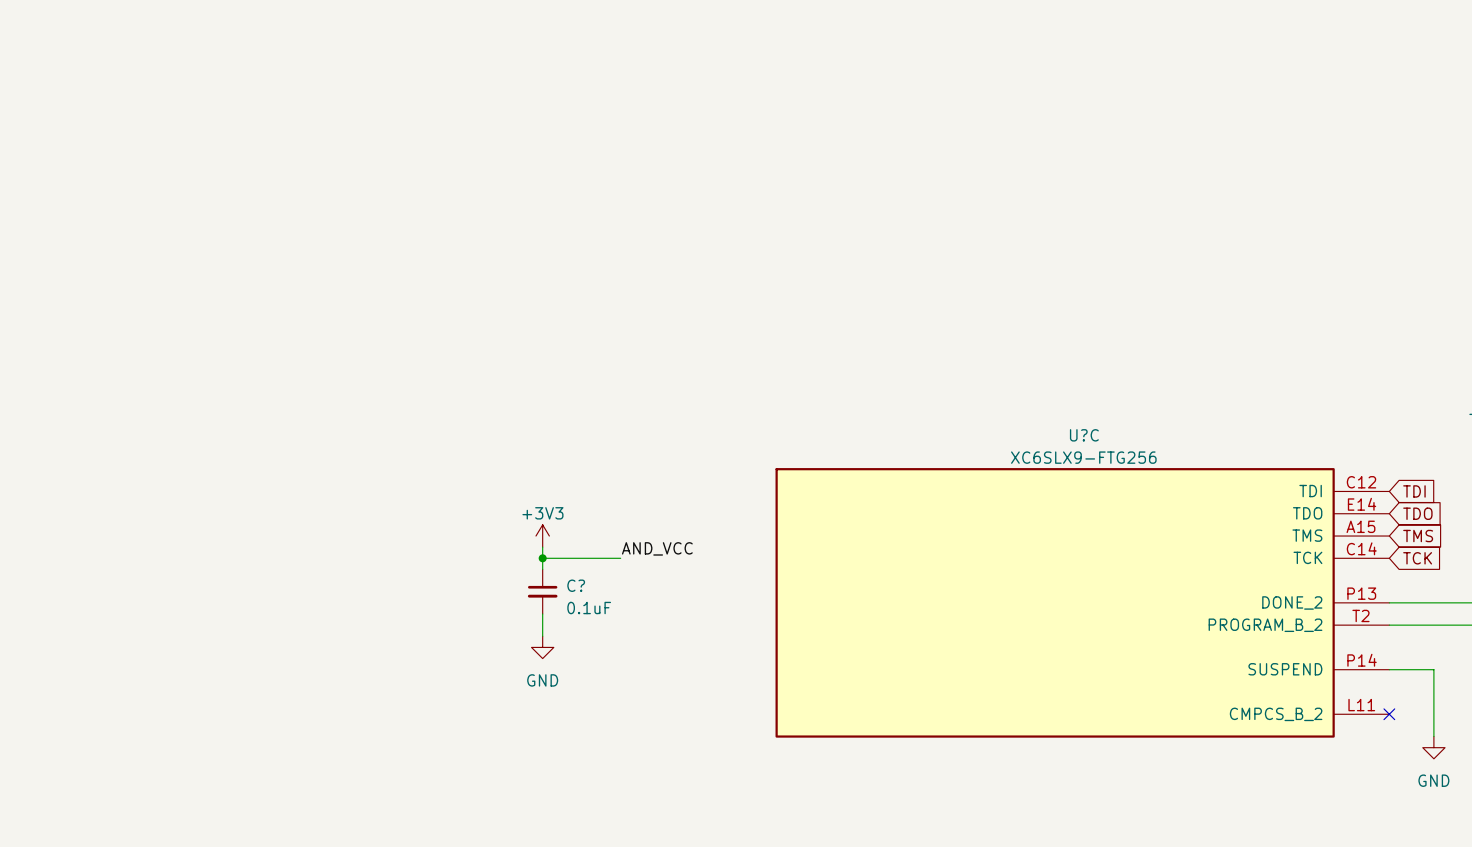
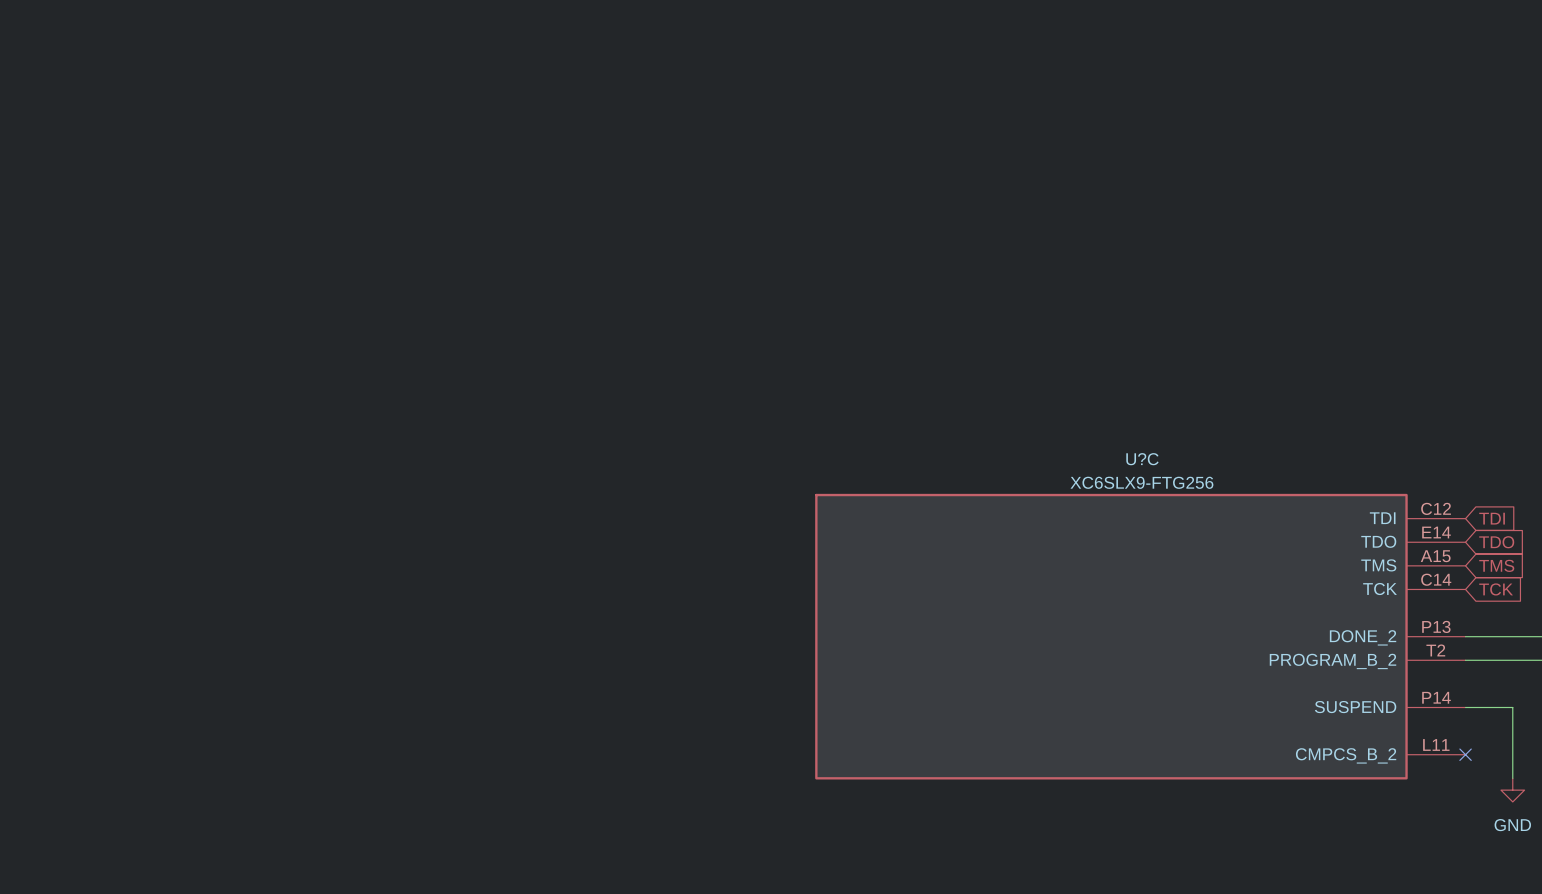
power symbol: +3V3 (542, 536) -> none
wire: (542, 547) (542, 569) -> none
label: AND_VCC (657, 548) -> none
wire: (542, 558) (620, 558) -> none
junction: (542, 558) -> none
C?: 0.1uF (542, 591) -> none
wire: (542, 614) (542, 636) -> none
power symbol: GND (542, 647) -> none

